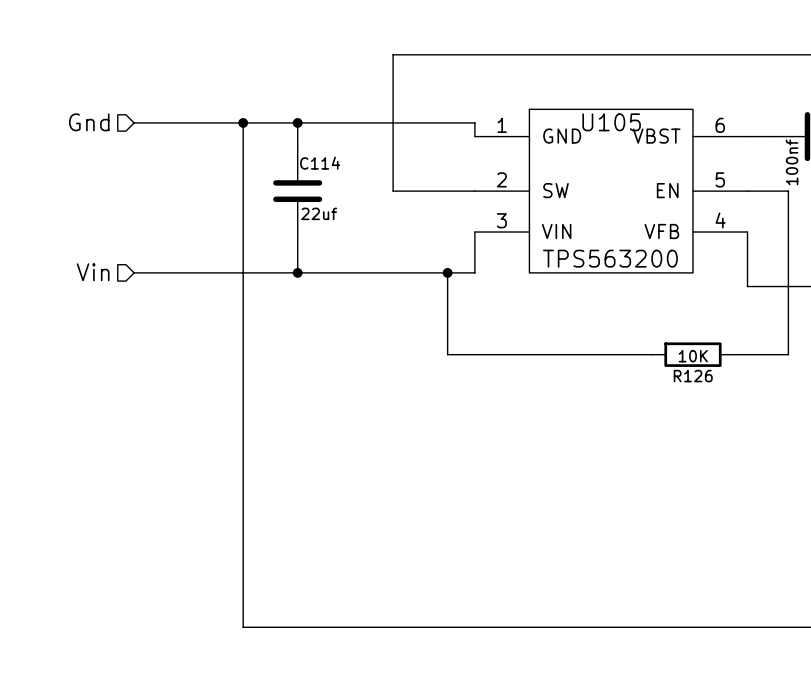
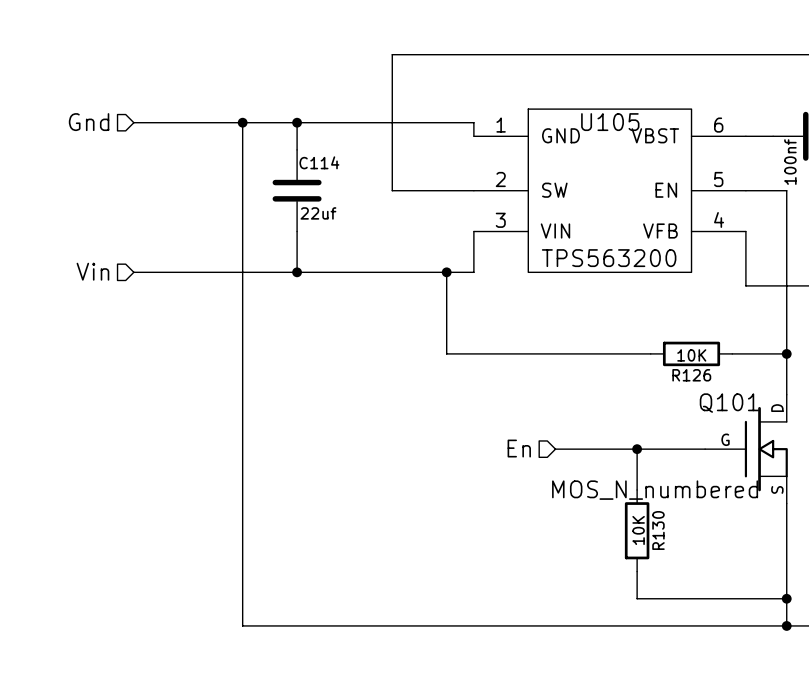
wire: none -> (786, 353) (786, 394)
junction: none -> (786, 353)
hierarchical label: none -> En (519, 448)
wire: none -> (555, 449) (705, 449)
wire: none -> (637, 449) (637, 489)
junction: none -> (637, 449)
Q101: none -> MOS_N_numbered (746, 449)
wire: none -> (786, 503) (786, 625)
R130: none -> 10K (637, 530)
wire: none -> (637, 571) (637, 598) (786, 598)
junction: none -> (786, 598)
junction: none -> (786, 625)

